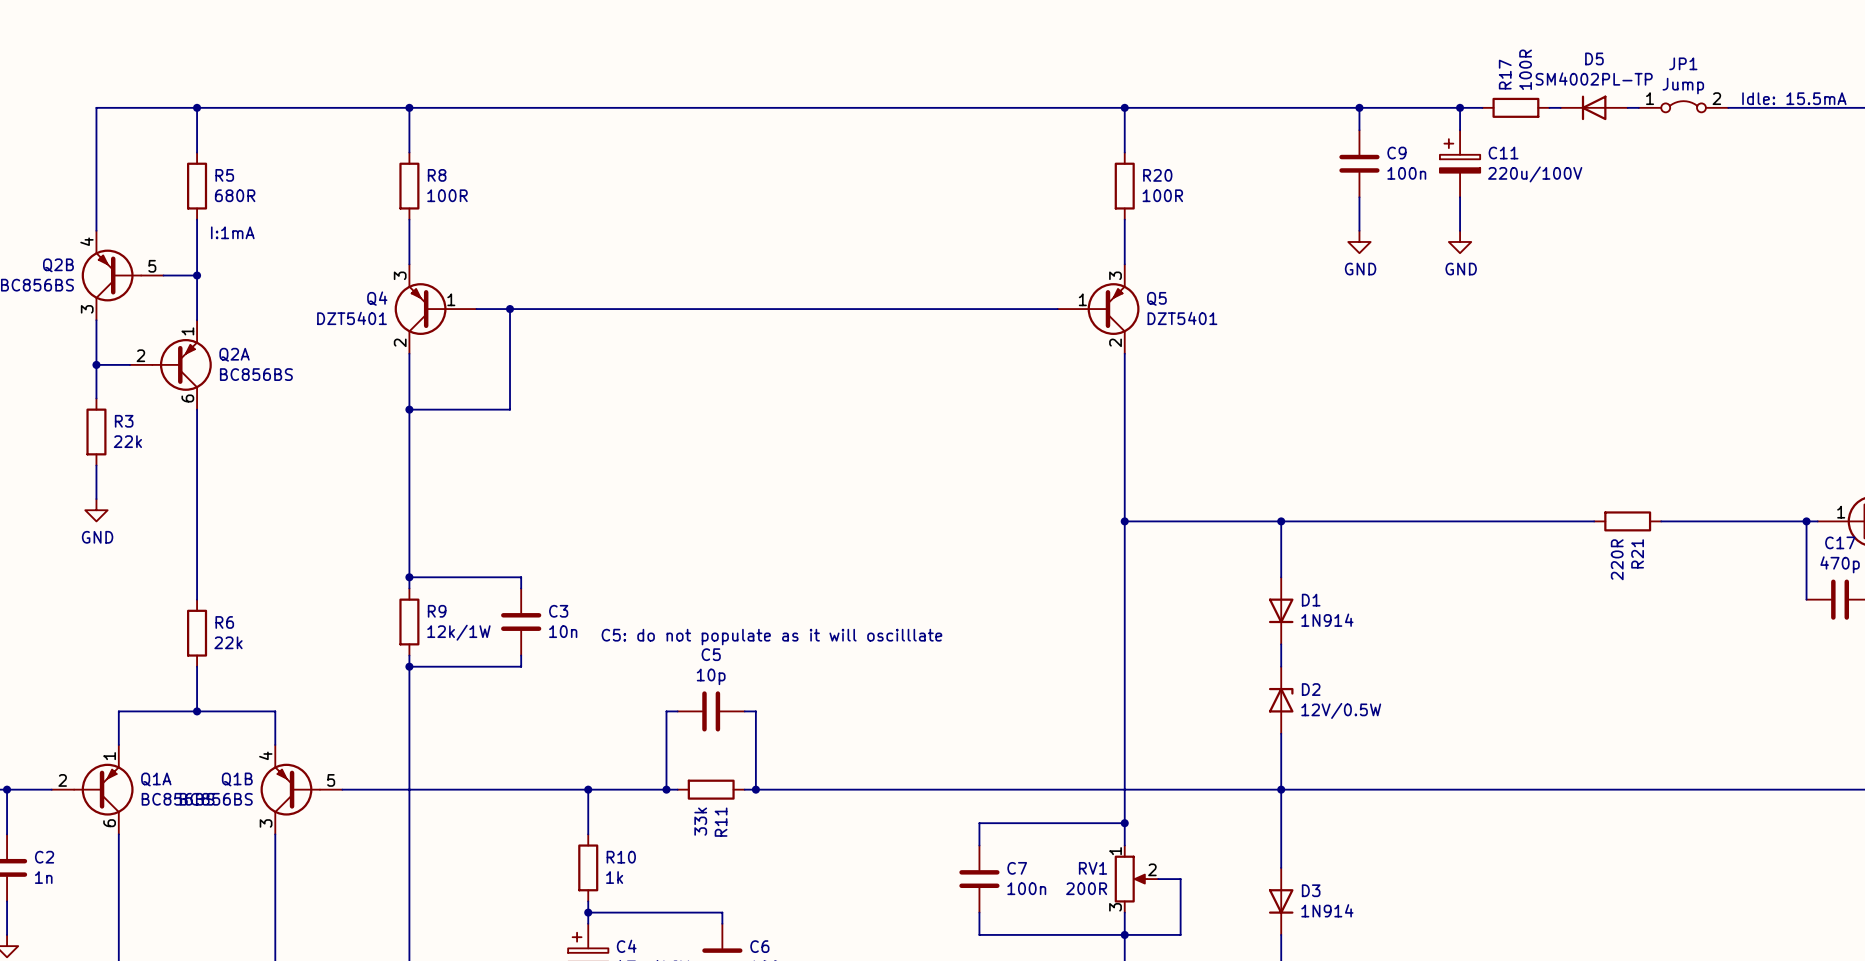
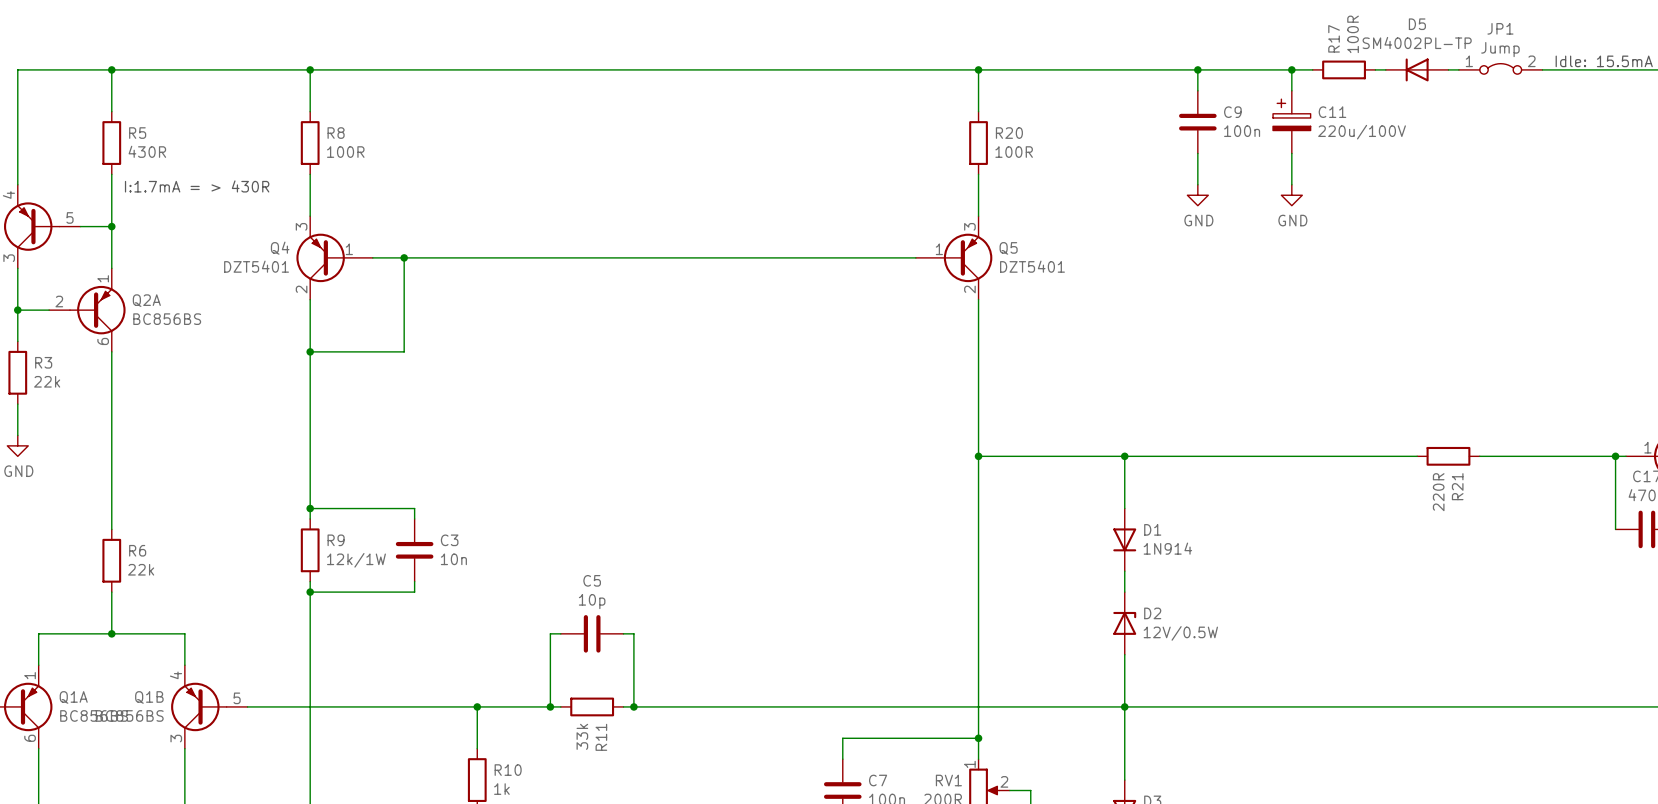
R5 value: 680R (235, 195) -> 430R (147, 151)
text: I:1mA (232, 232) -> I:1.7mA = > 430R (197, 186)
text: C5: do not populate as it will oscilllate (771, 637) -> none

